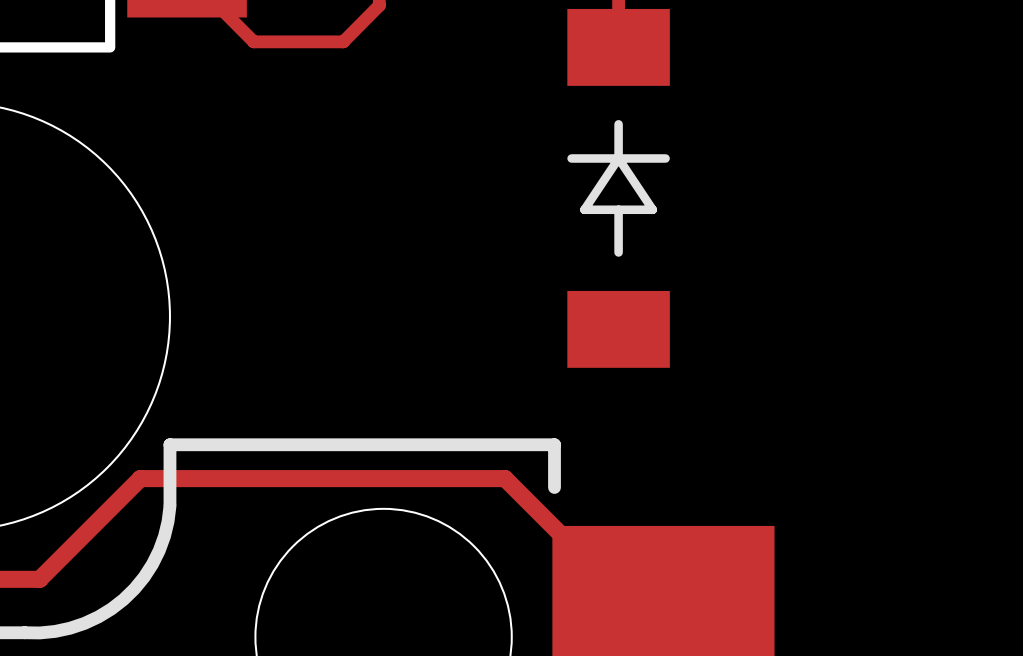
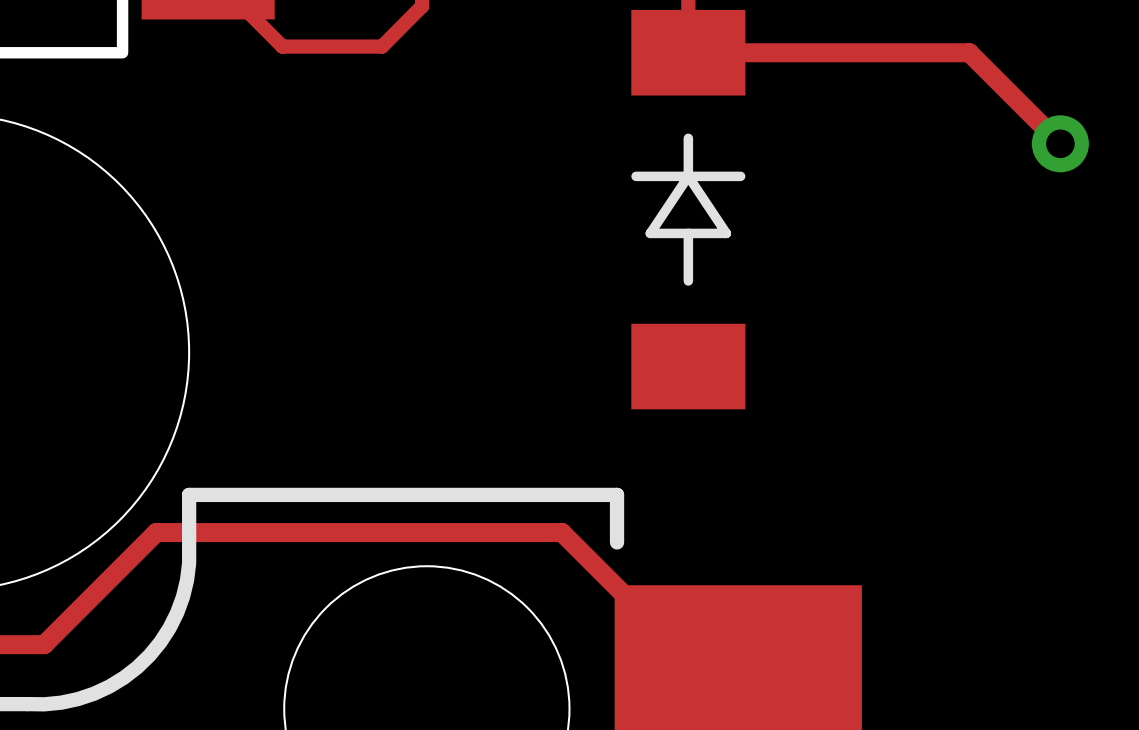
track: none -> (688, 52) (969, 52) (1060, 143)
via: none -> (1060, 143)

